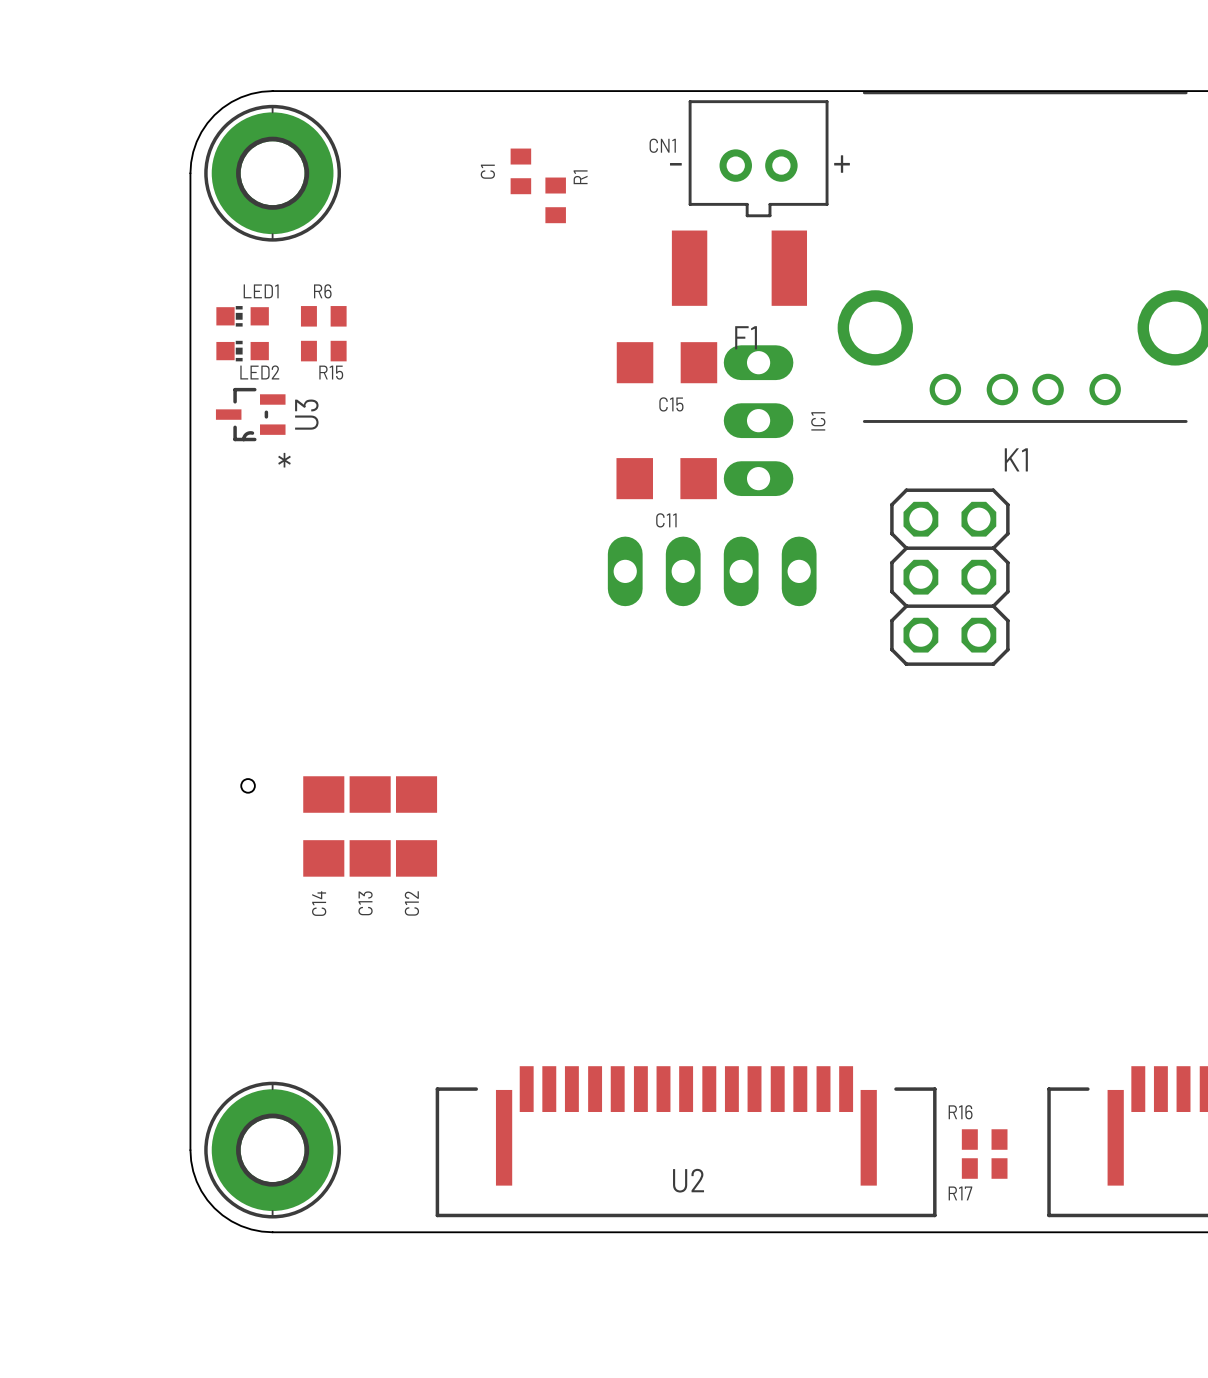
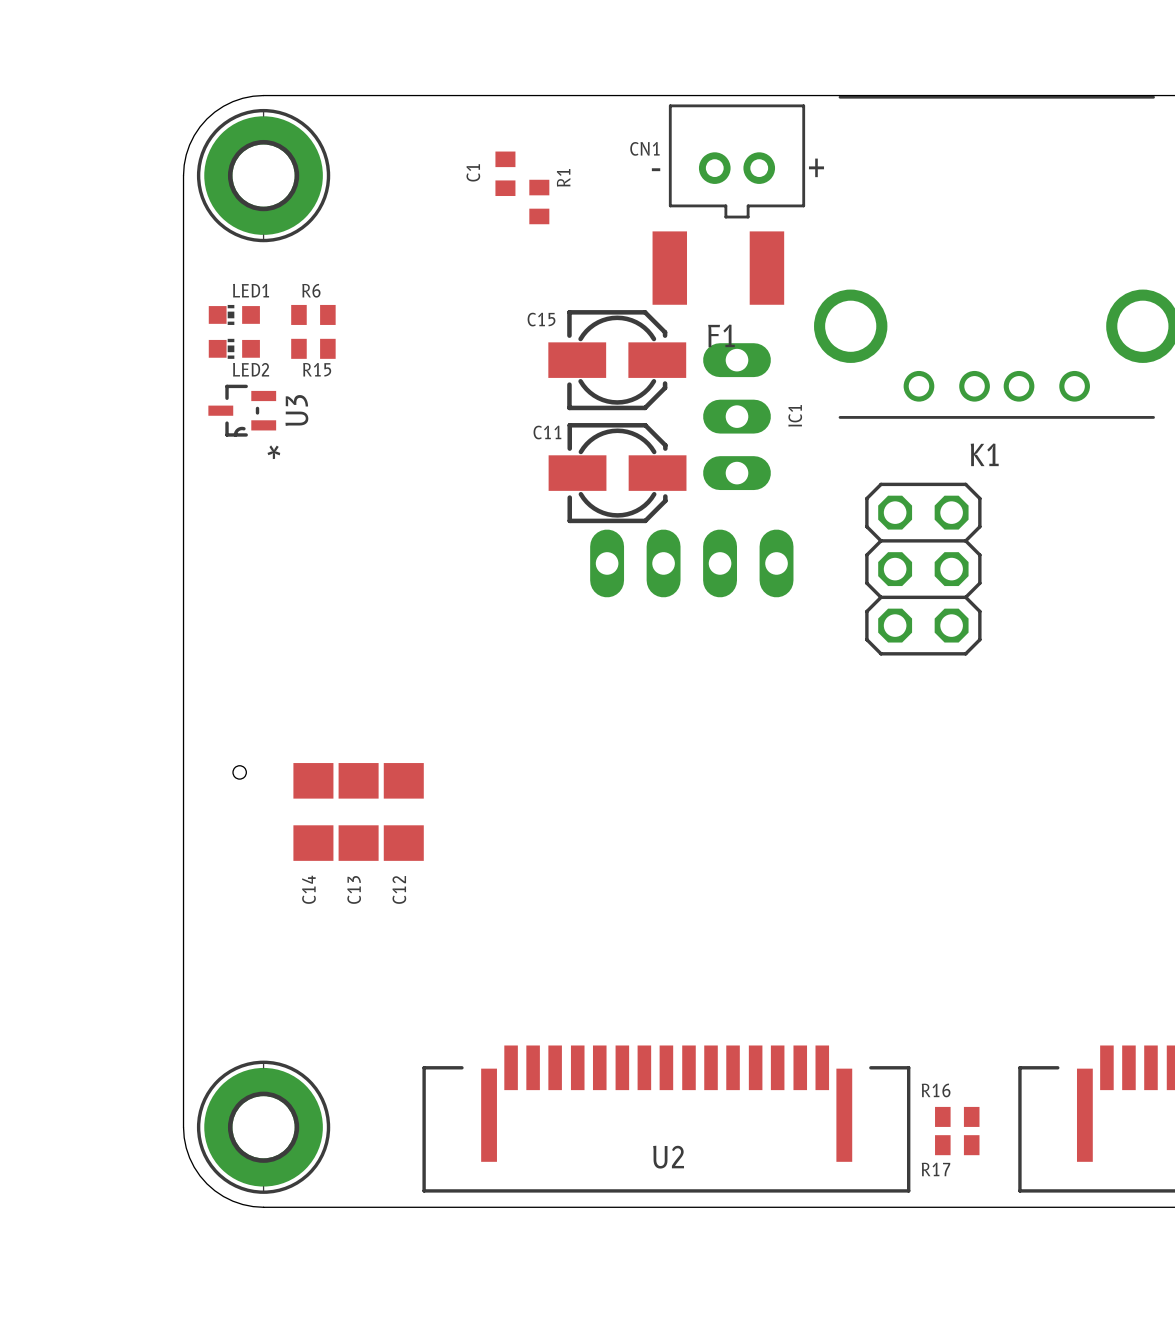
C15 footprint: [616, 342, 718, 384] -> [548, 310, 687, 411]
C15 name position: C15 (671, 404) -> C15 (541, 319)
C11 footprint: [616, 458, 717, 500] -> [548, 423, 687, 524]
C11 name position: C11 (666, 520) -> C11 (547, 432)

